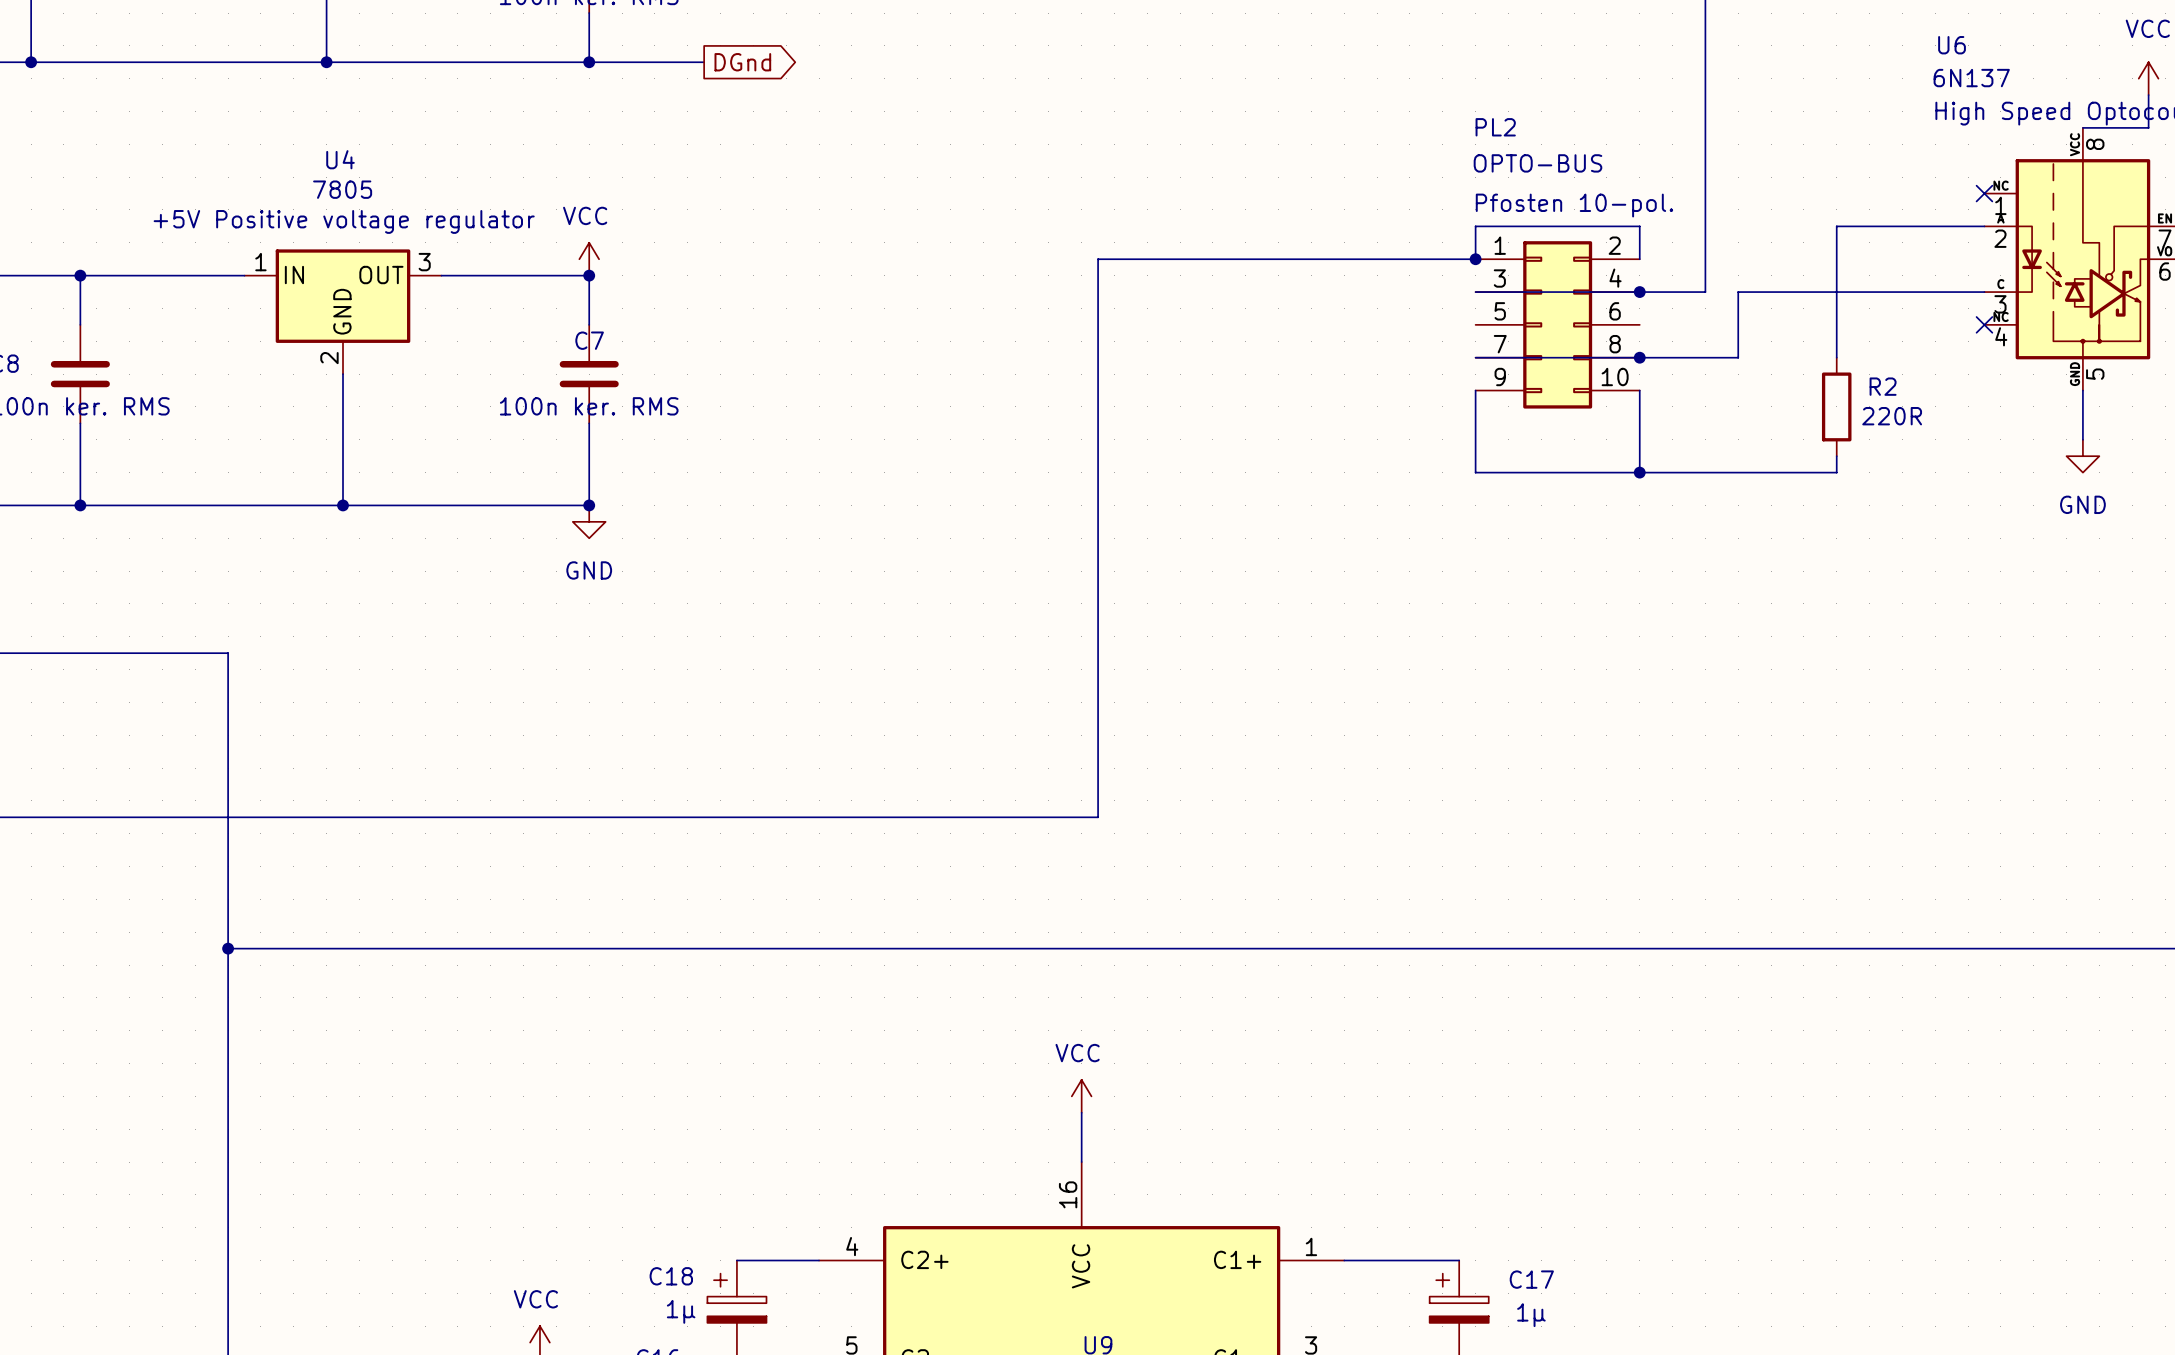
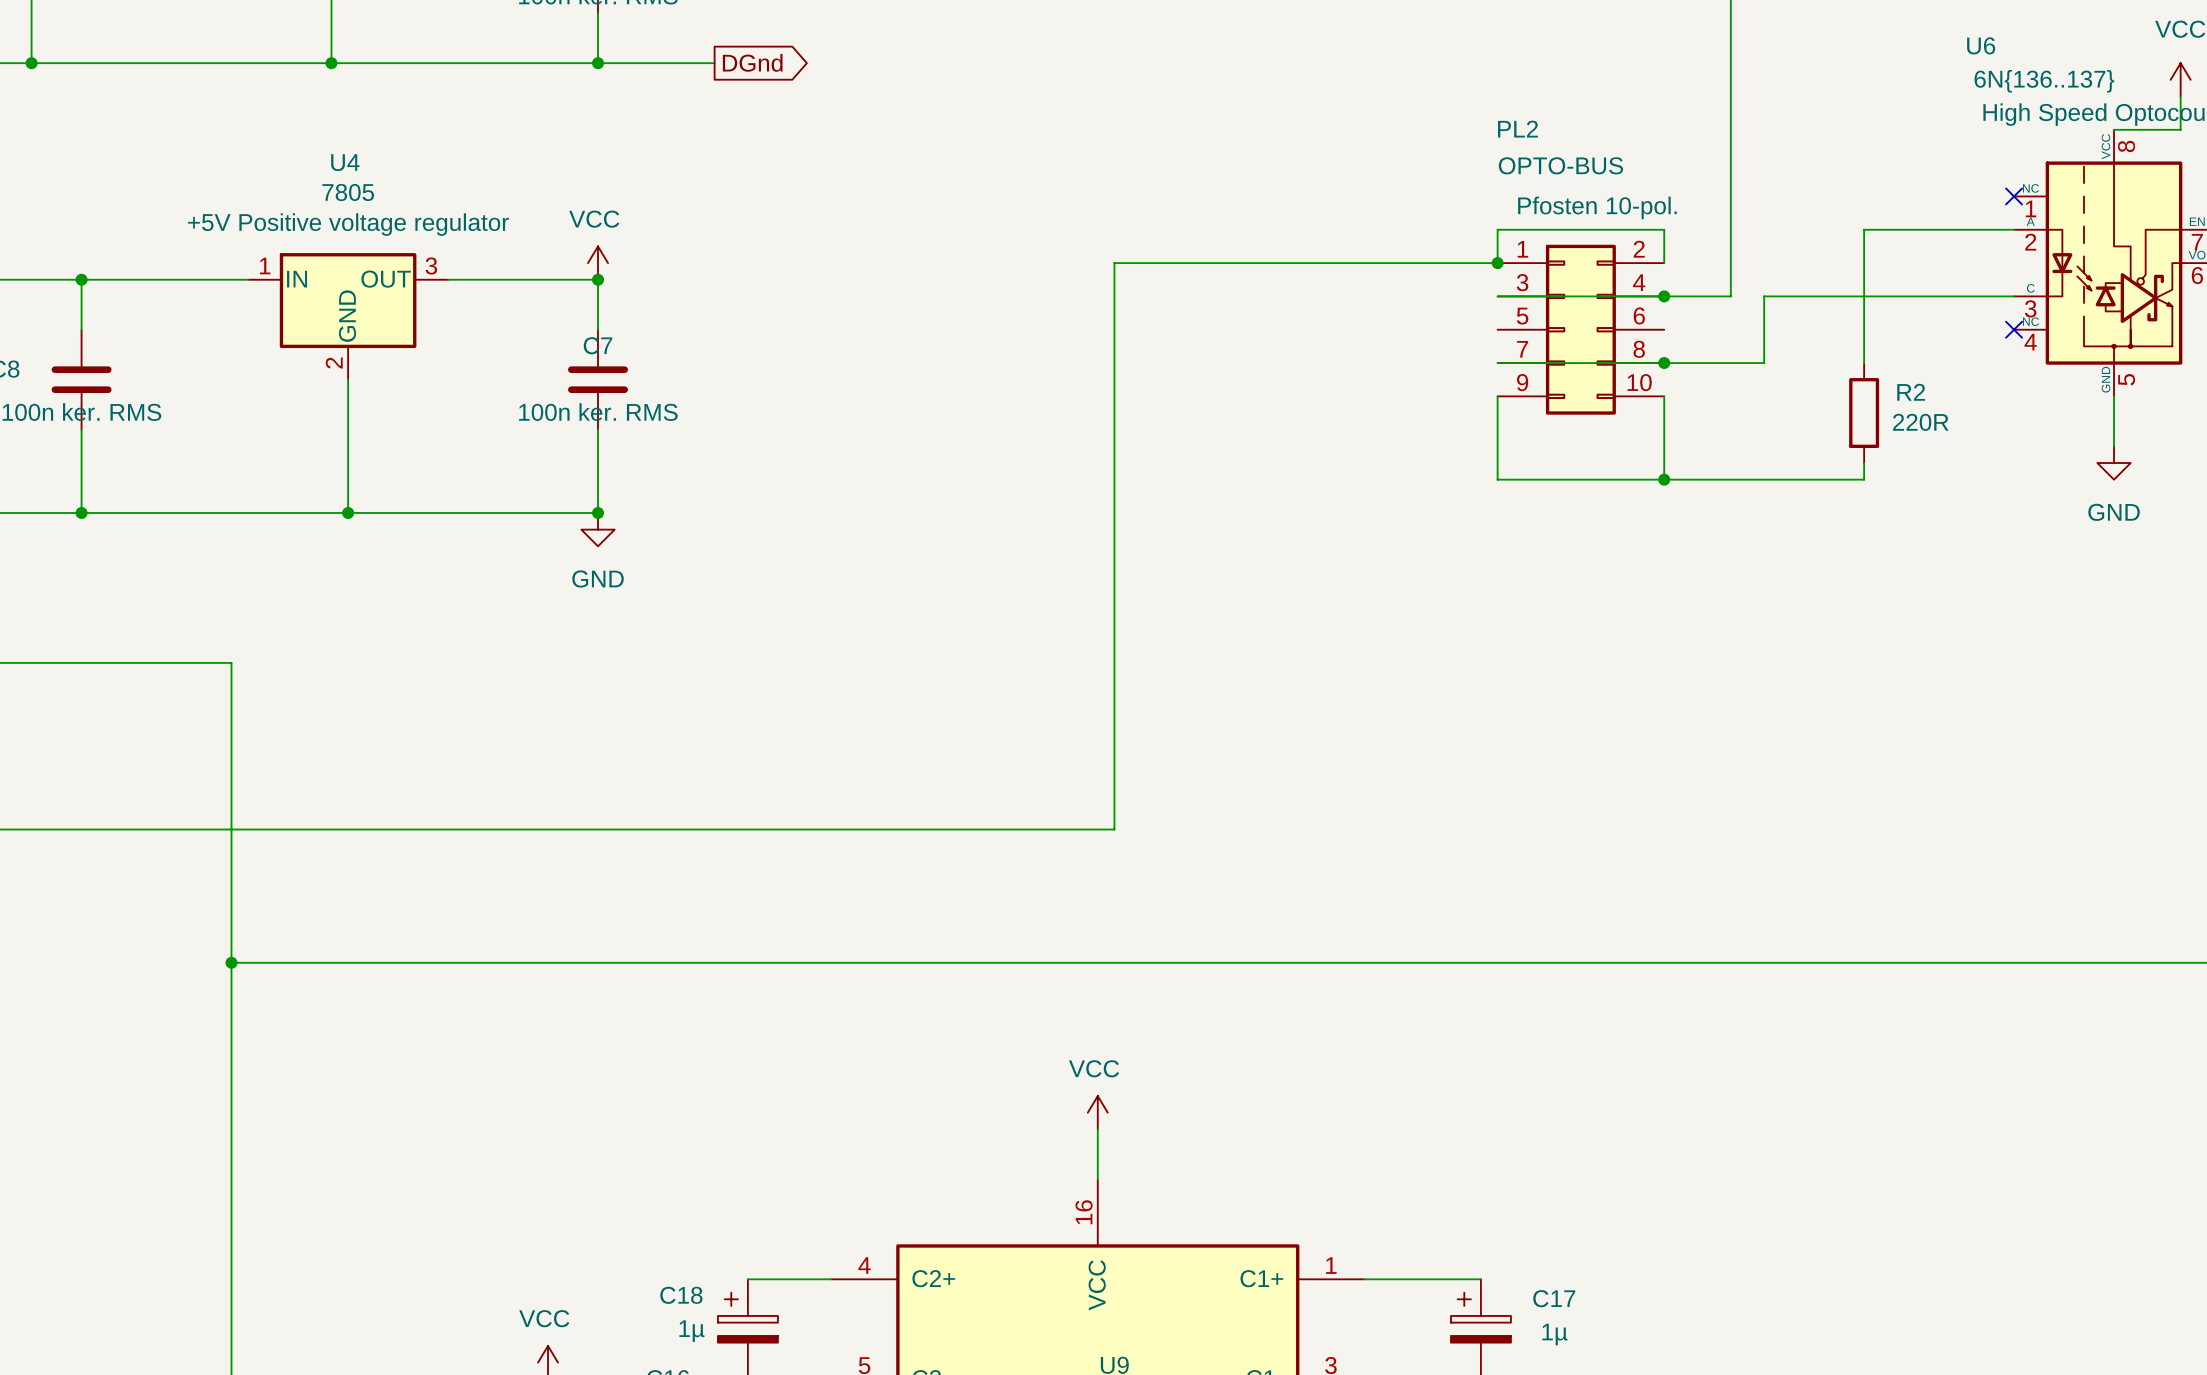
U6 value: 6N137 (1971, 78) -> 6N{136..137} (2044, 81)

